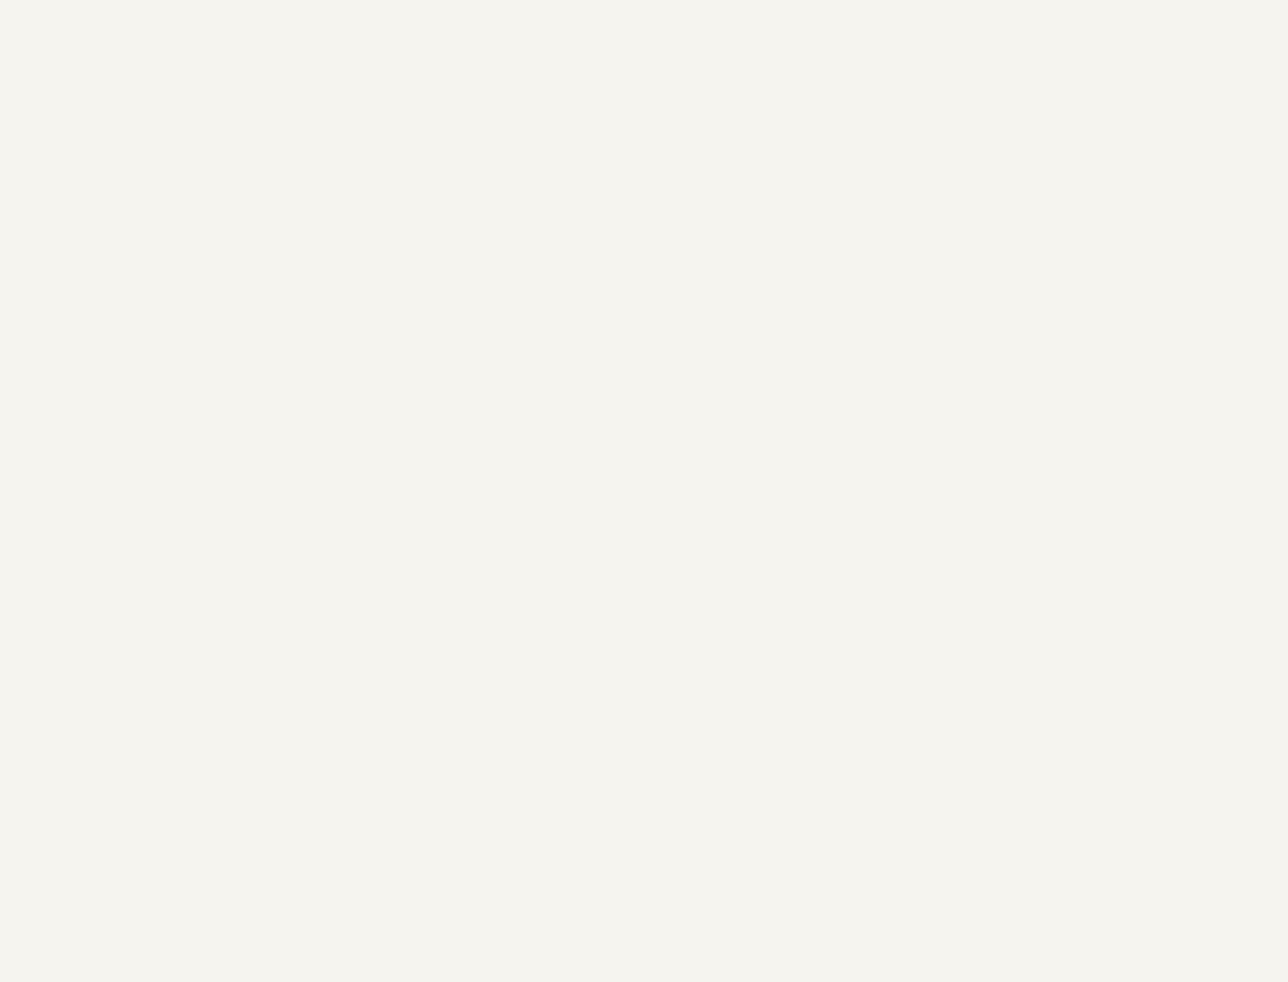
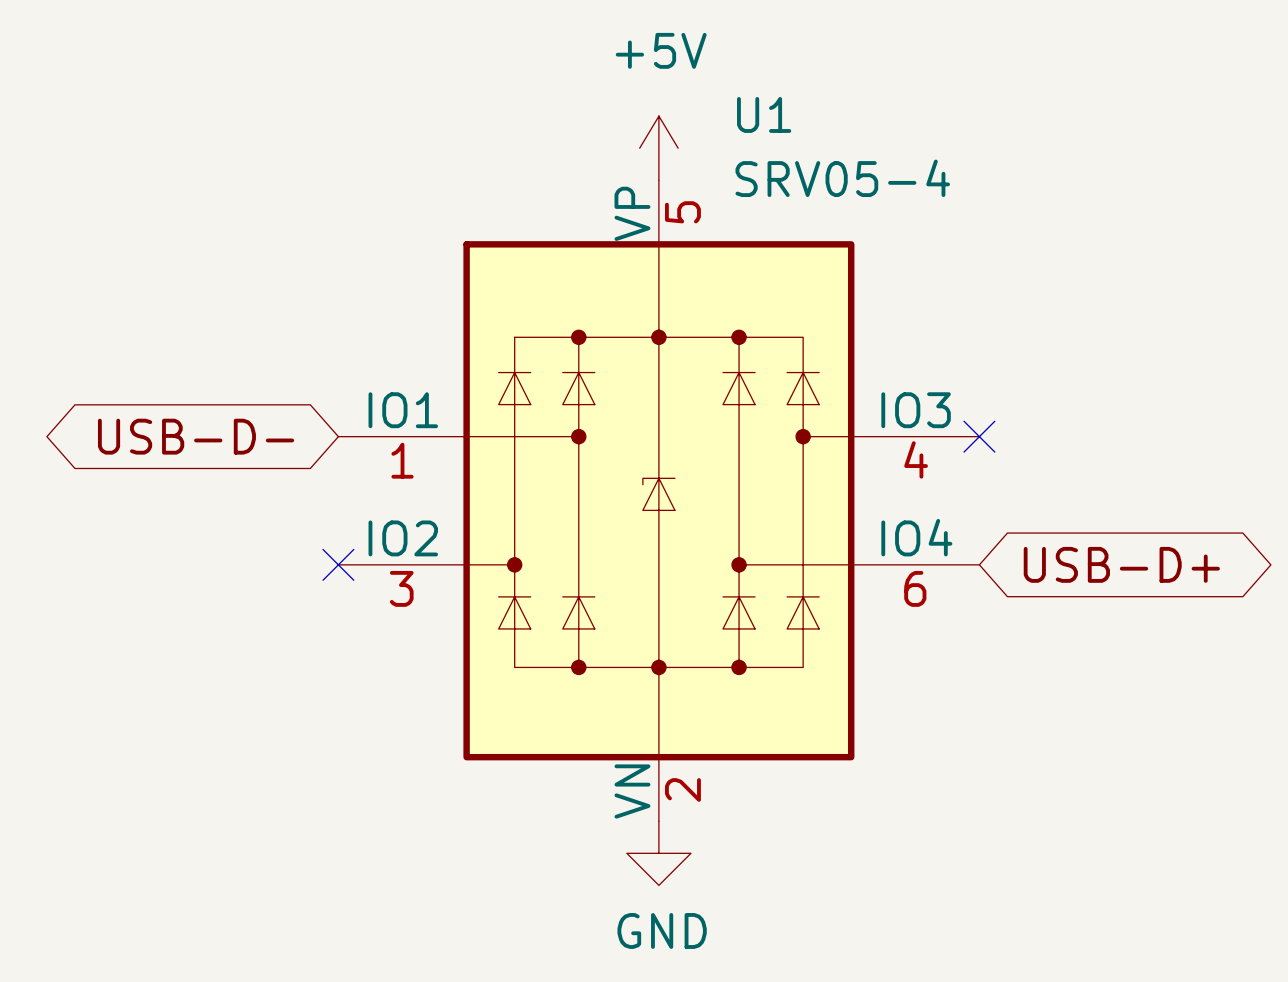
power symbol: none -> +5V (658, 148)
global label: none -> USB-D- (196, 436)
no-connect mark: none -> (979, 436)
U1: none -> SRV05-4 (658, 500)
no-connect mark: none -> (338, 564)
global label: none -> USB-D+ (1121, 564)
power symbol: none -> GND (658, 853)

